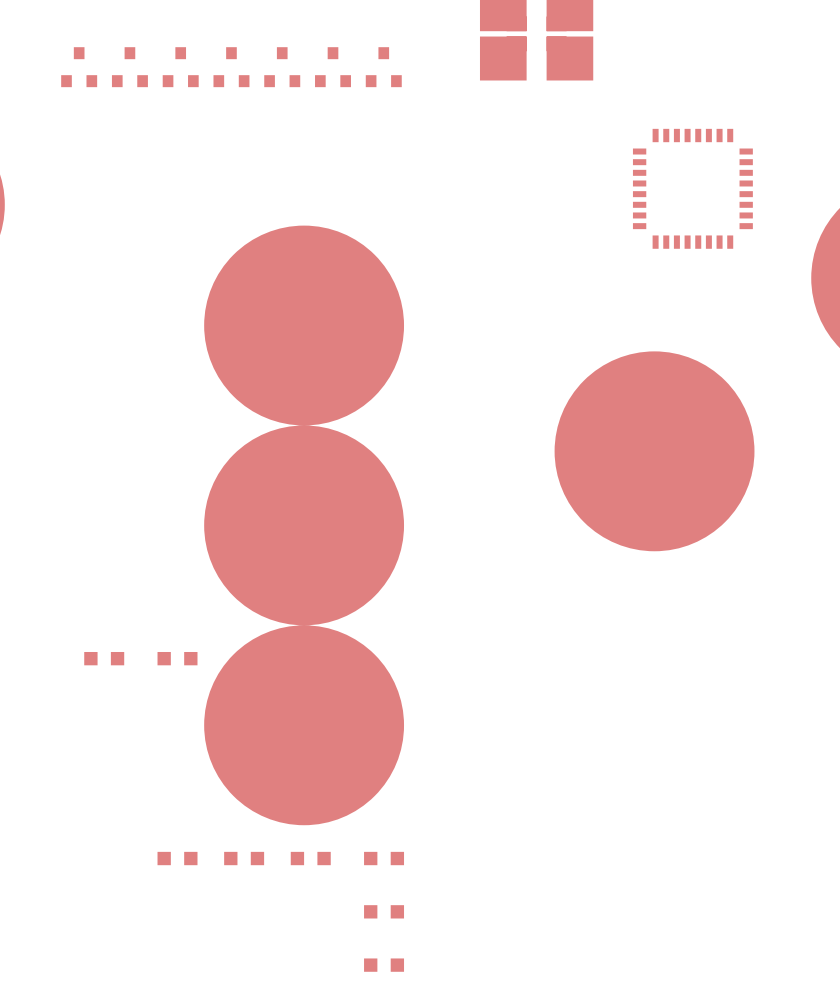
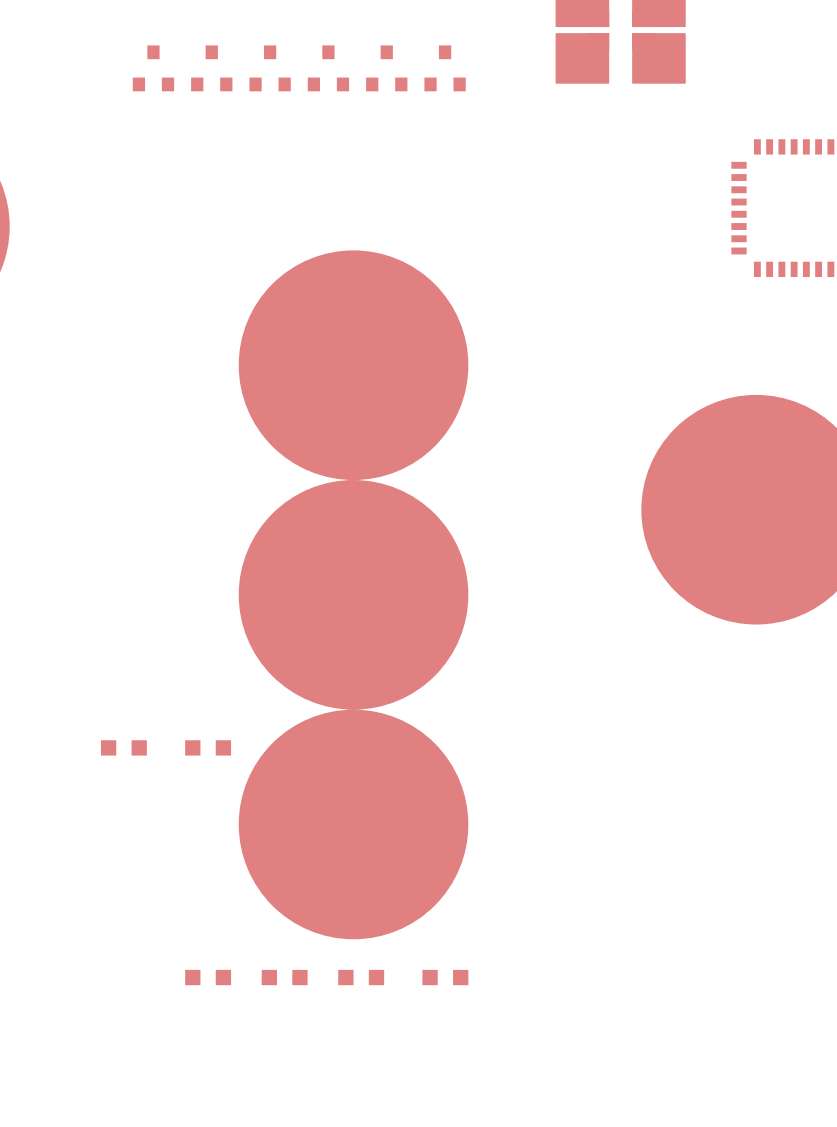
part: (79, 67) -> none
part: (384, 911) -> none
part: (384, 965) -> none

